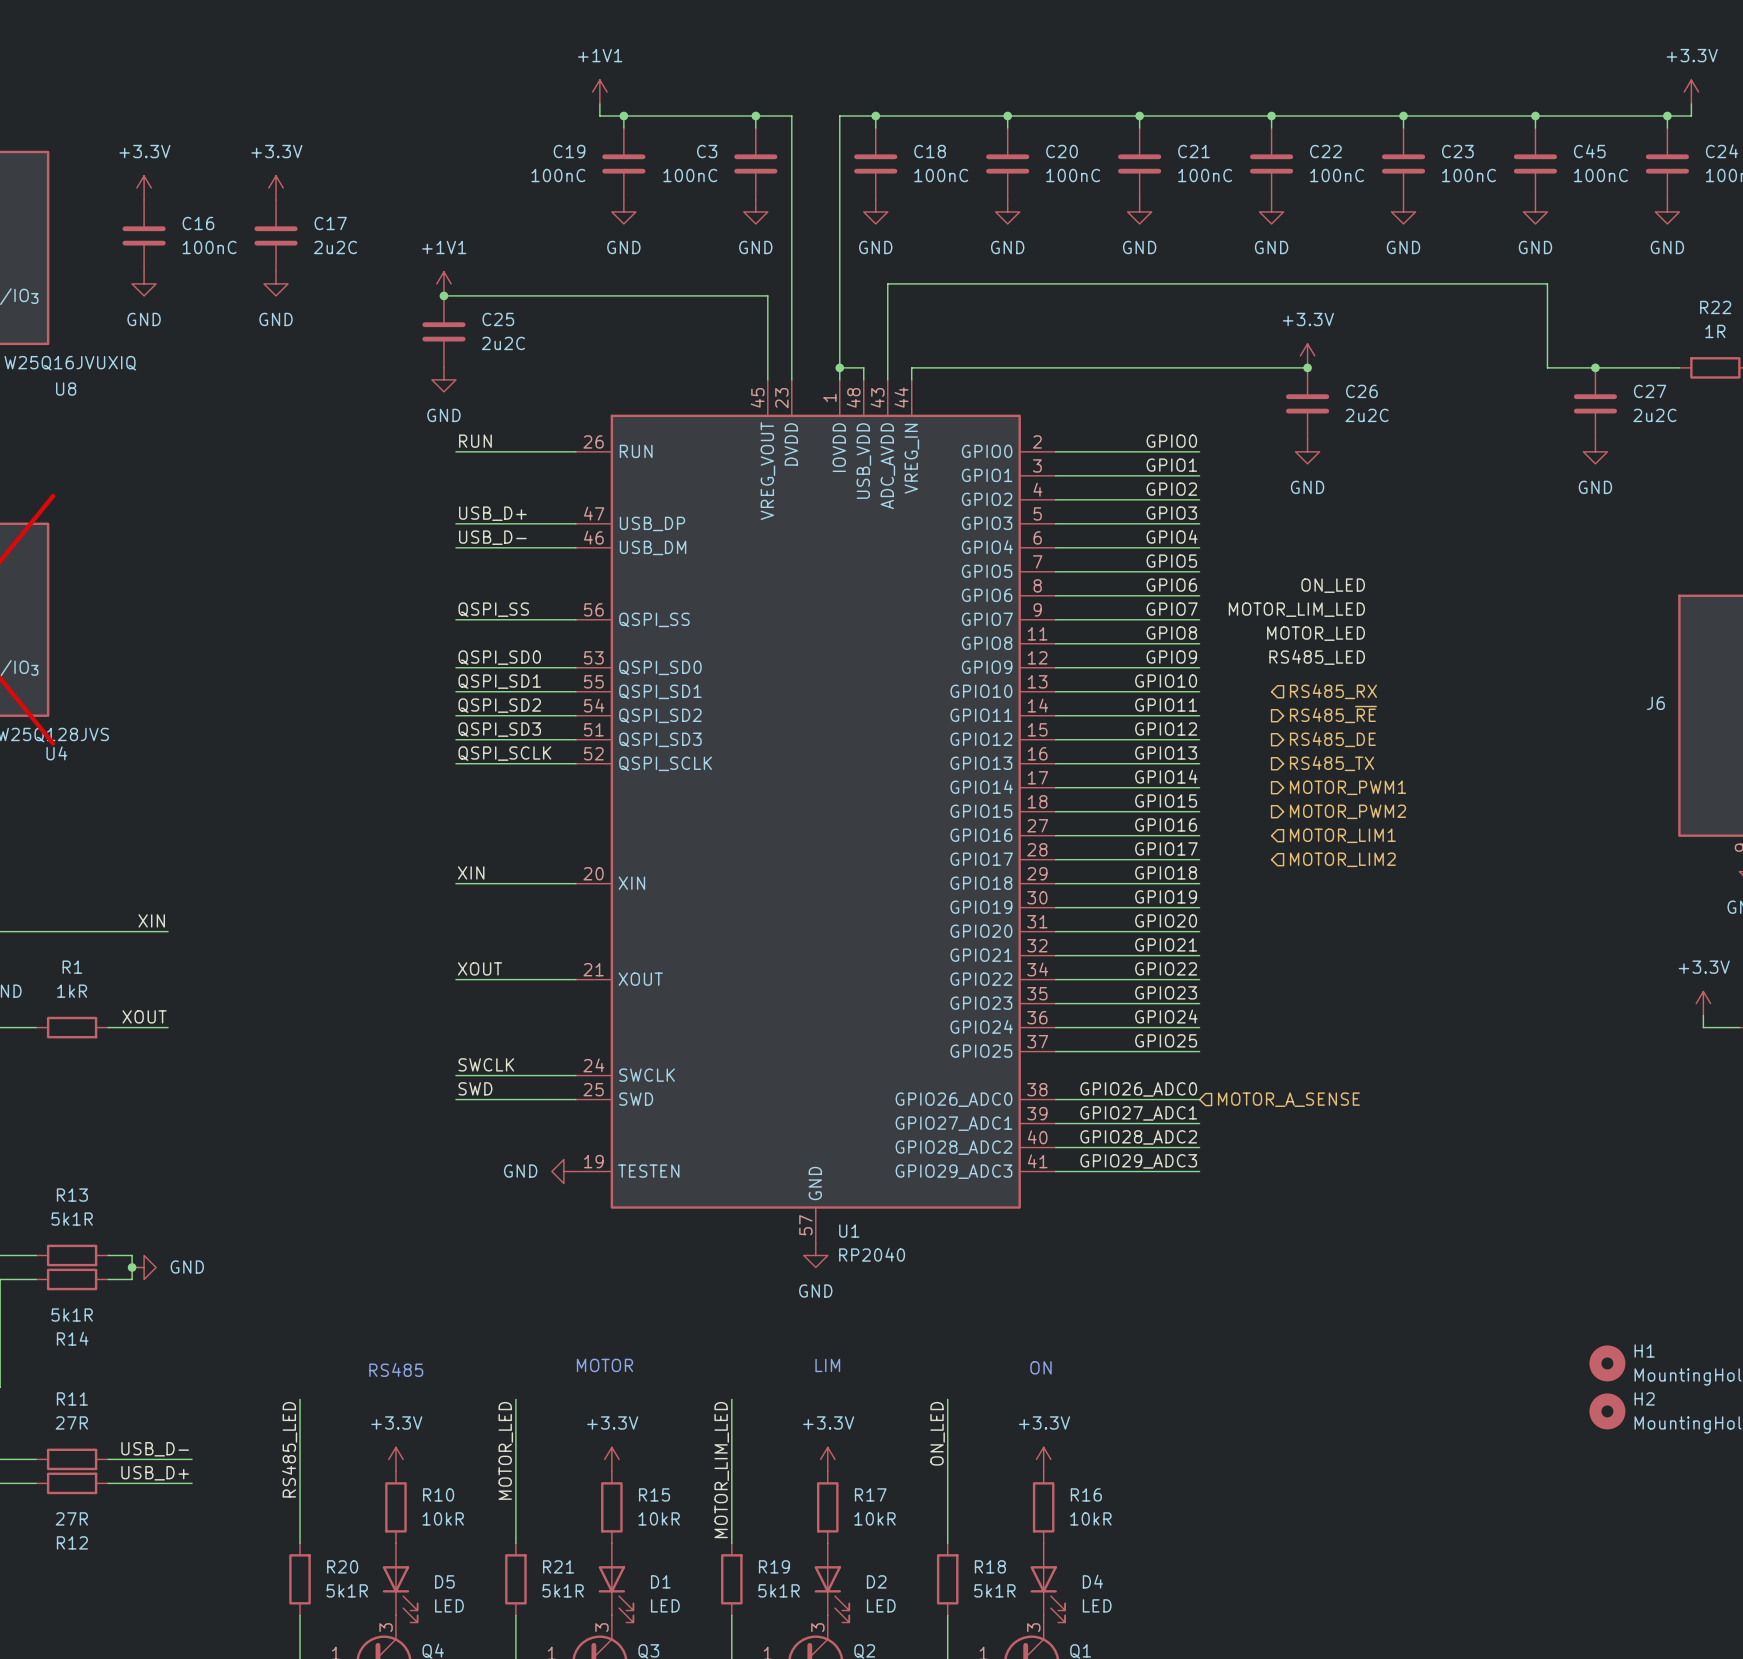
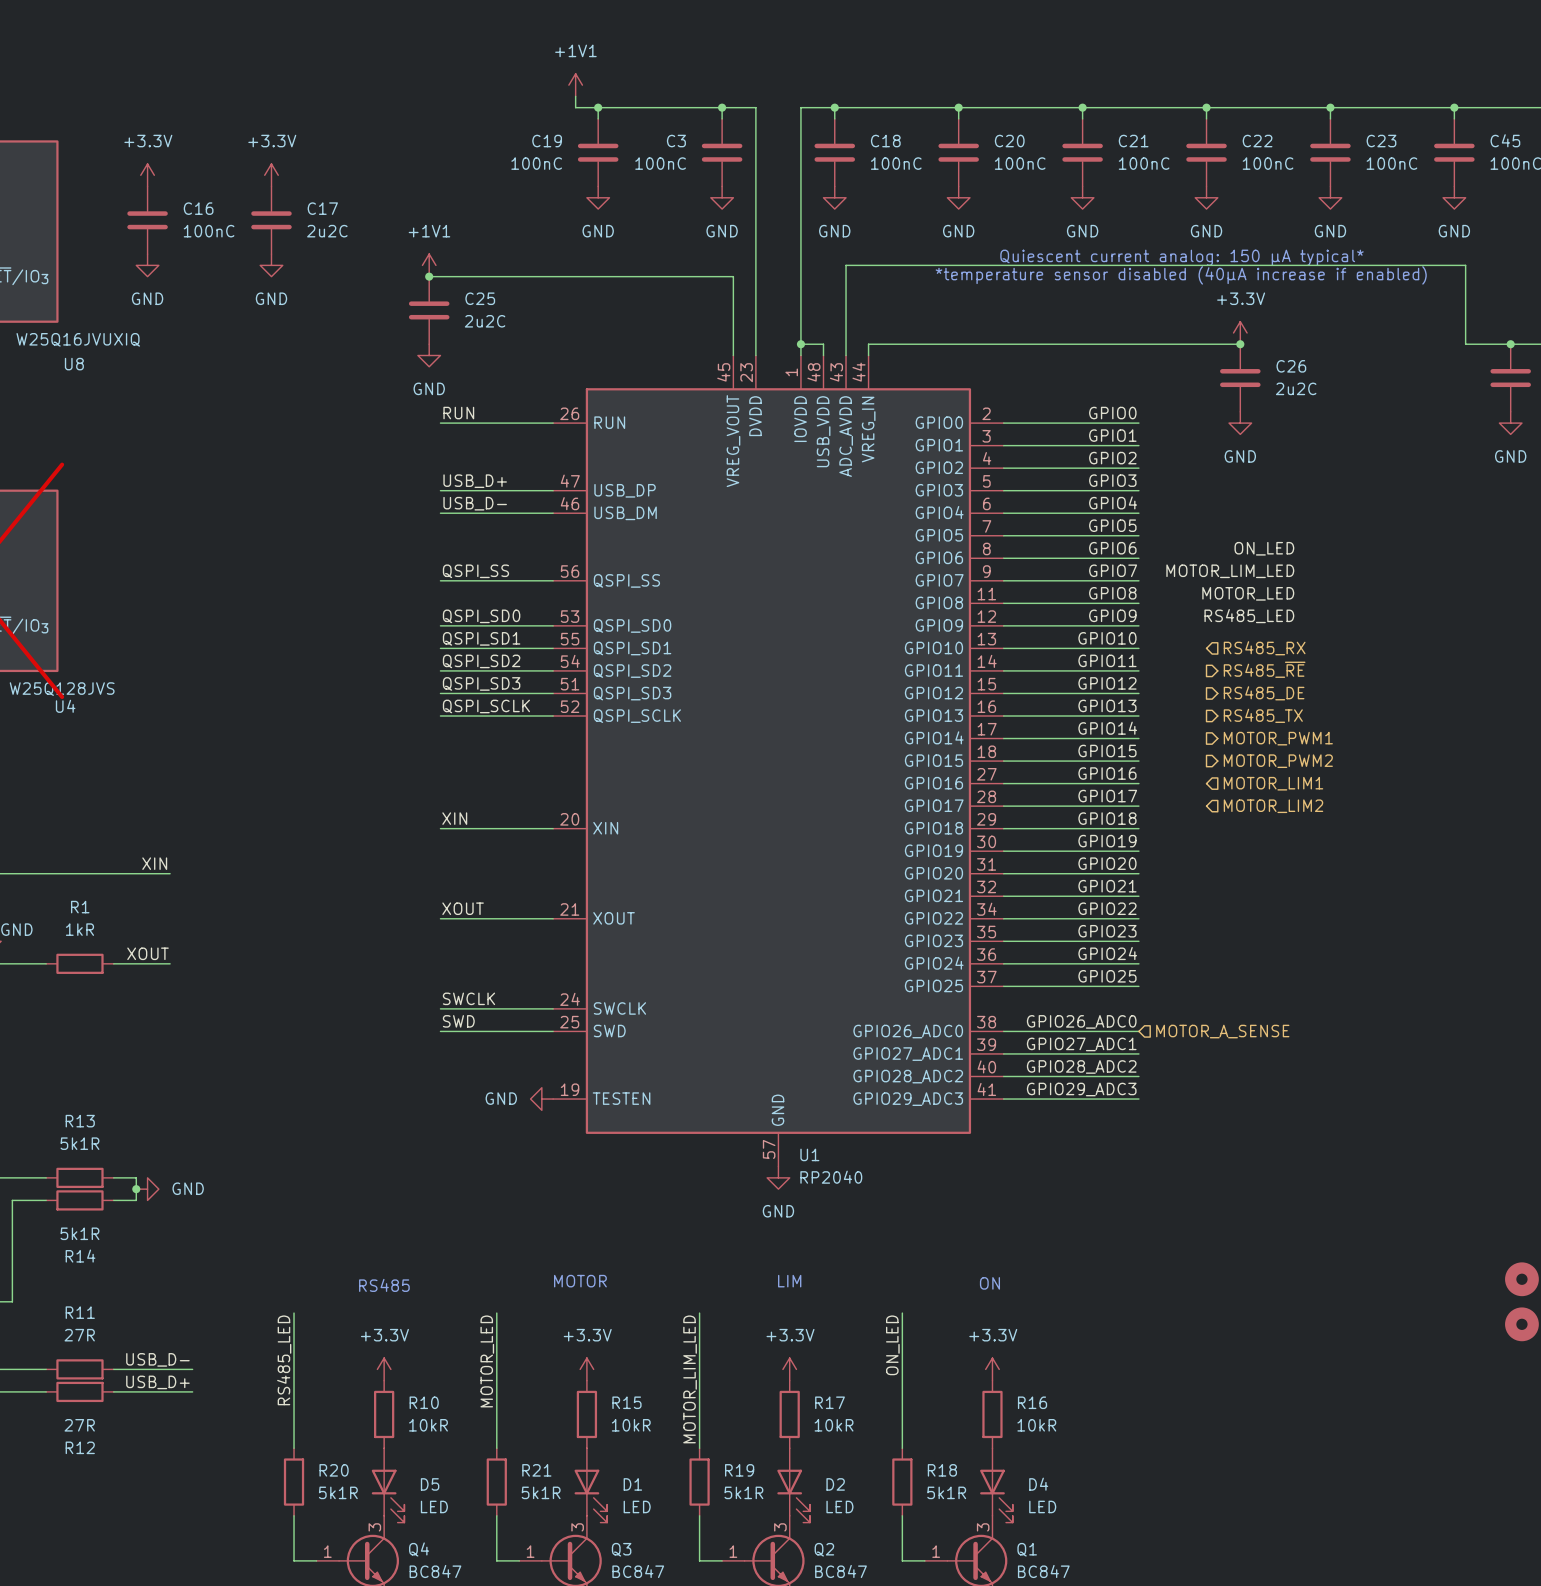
text: none -> Quiescent current analog: 150 µA typical* (1182, 257)
text: none -> *temperature sensor disabled (40μA increase if enabled) (1181, 275)

